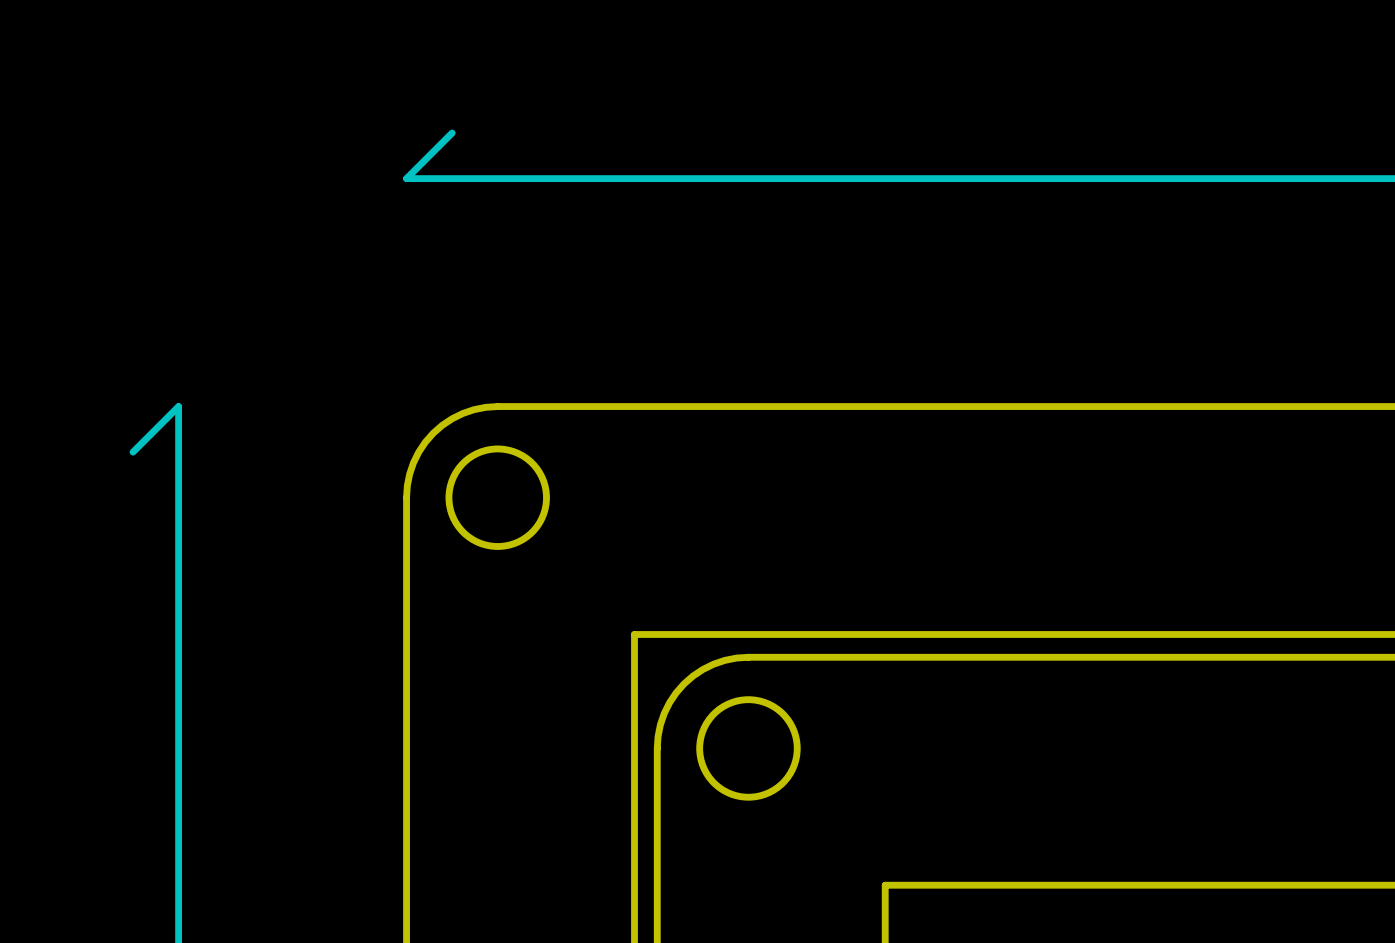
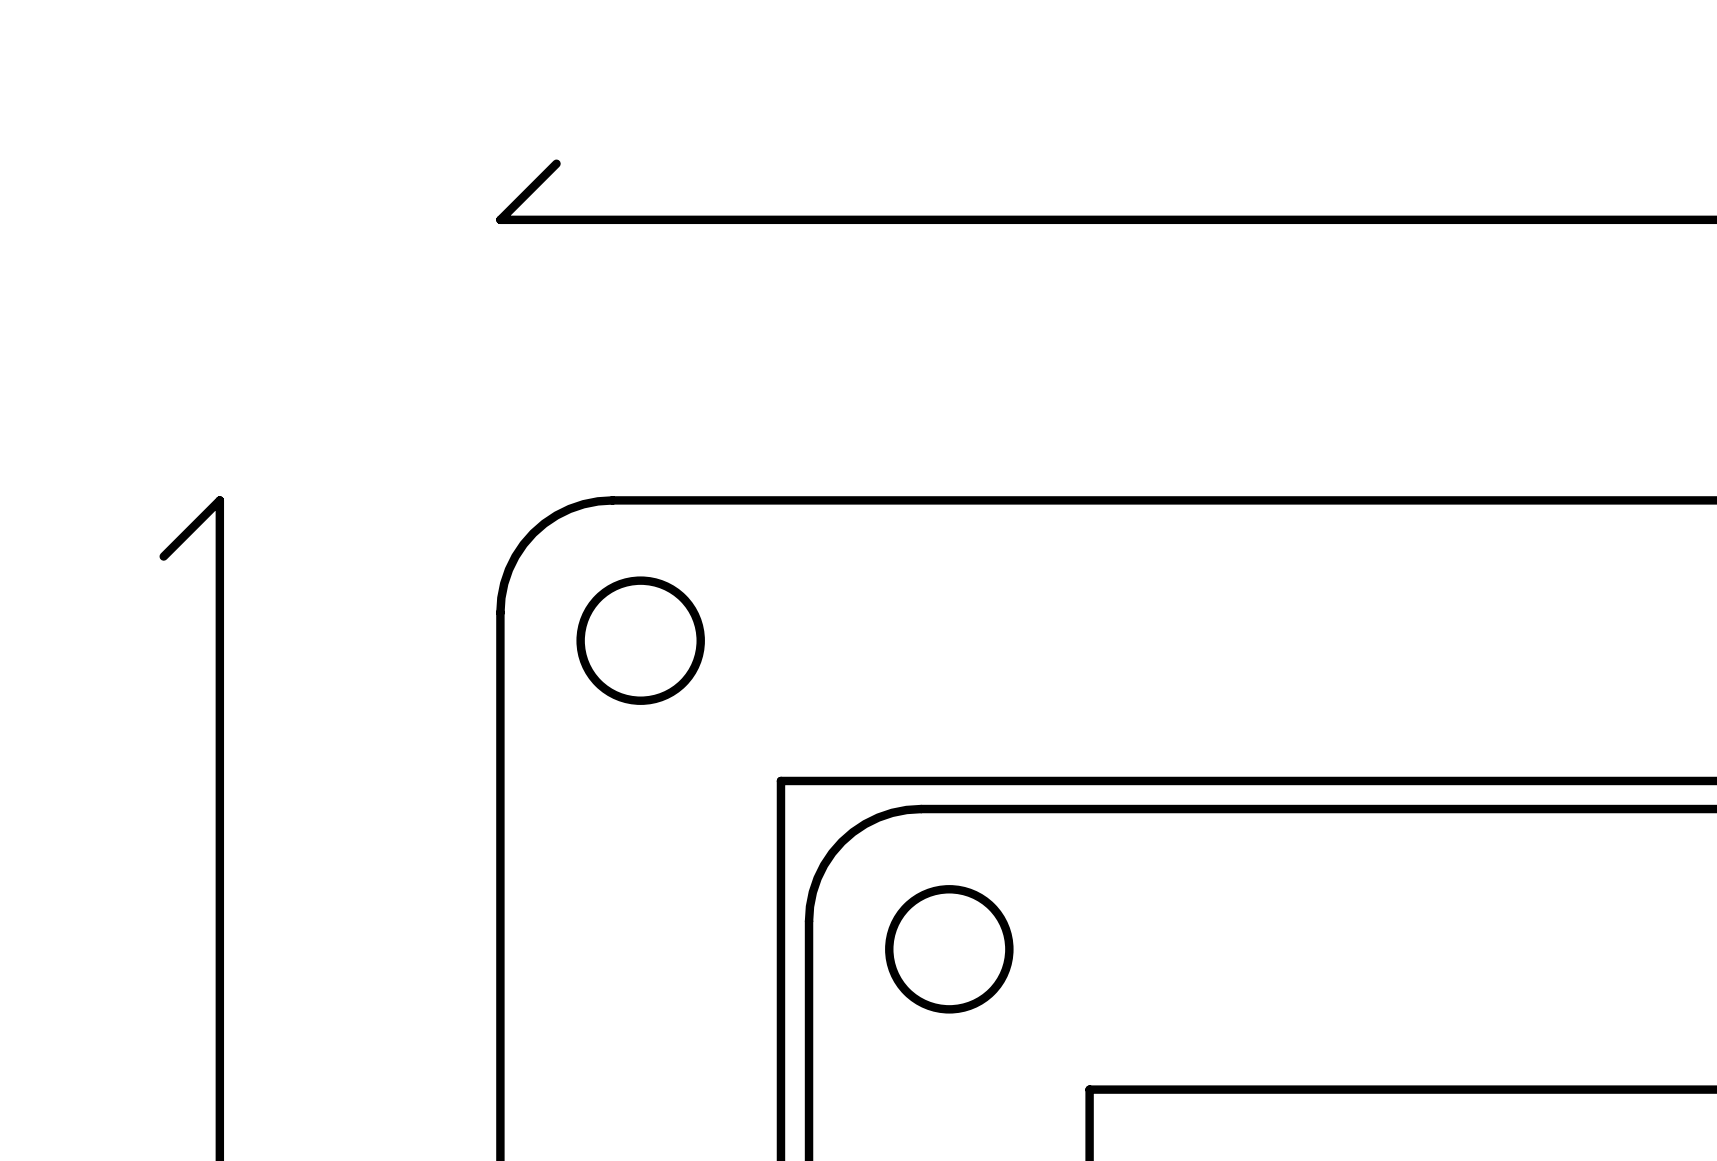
drawing position: (497, 497) -> (640, 640)
drawing position: (748, 748) -> (949, 949)

